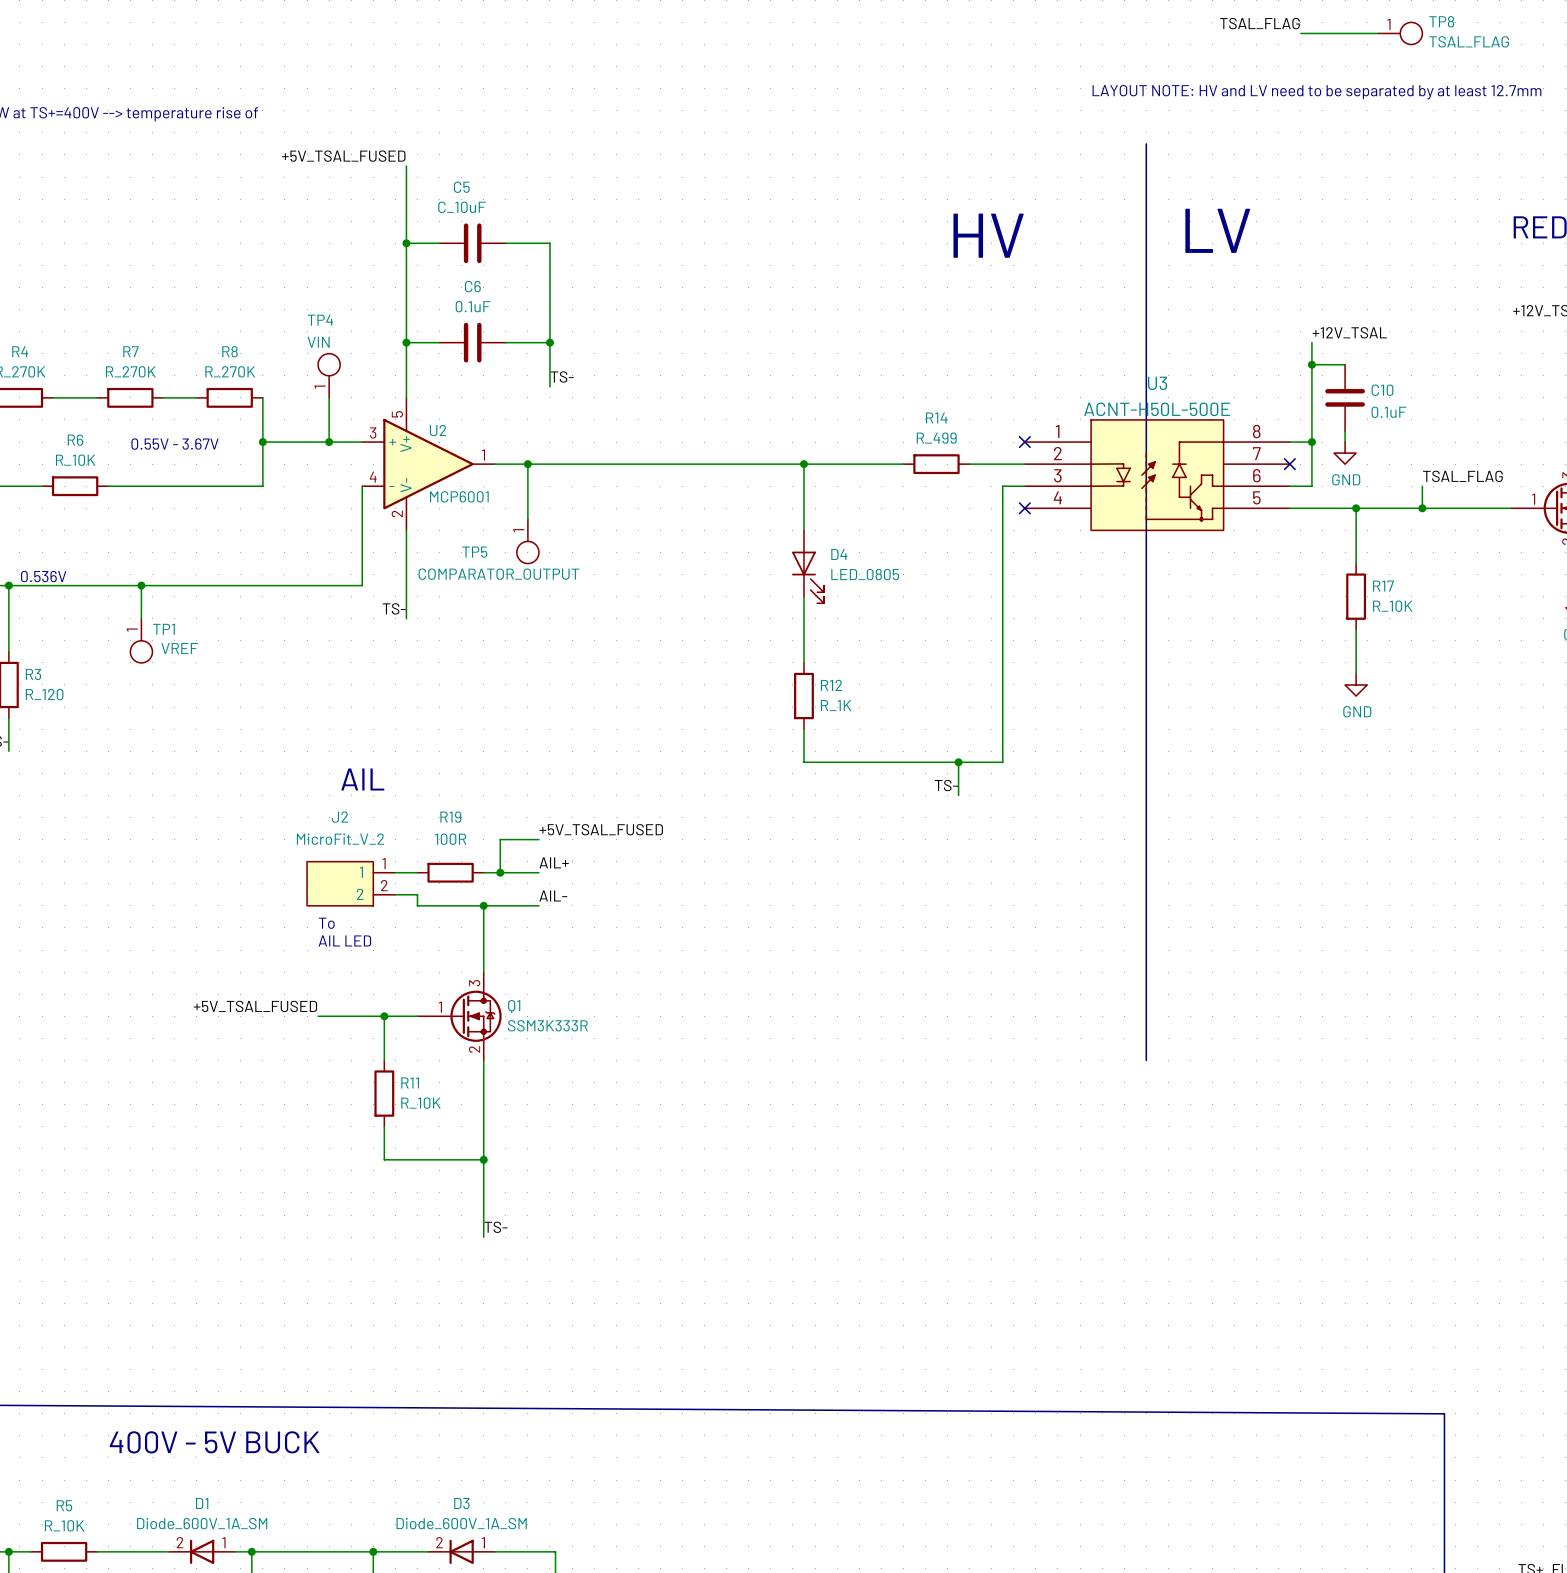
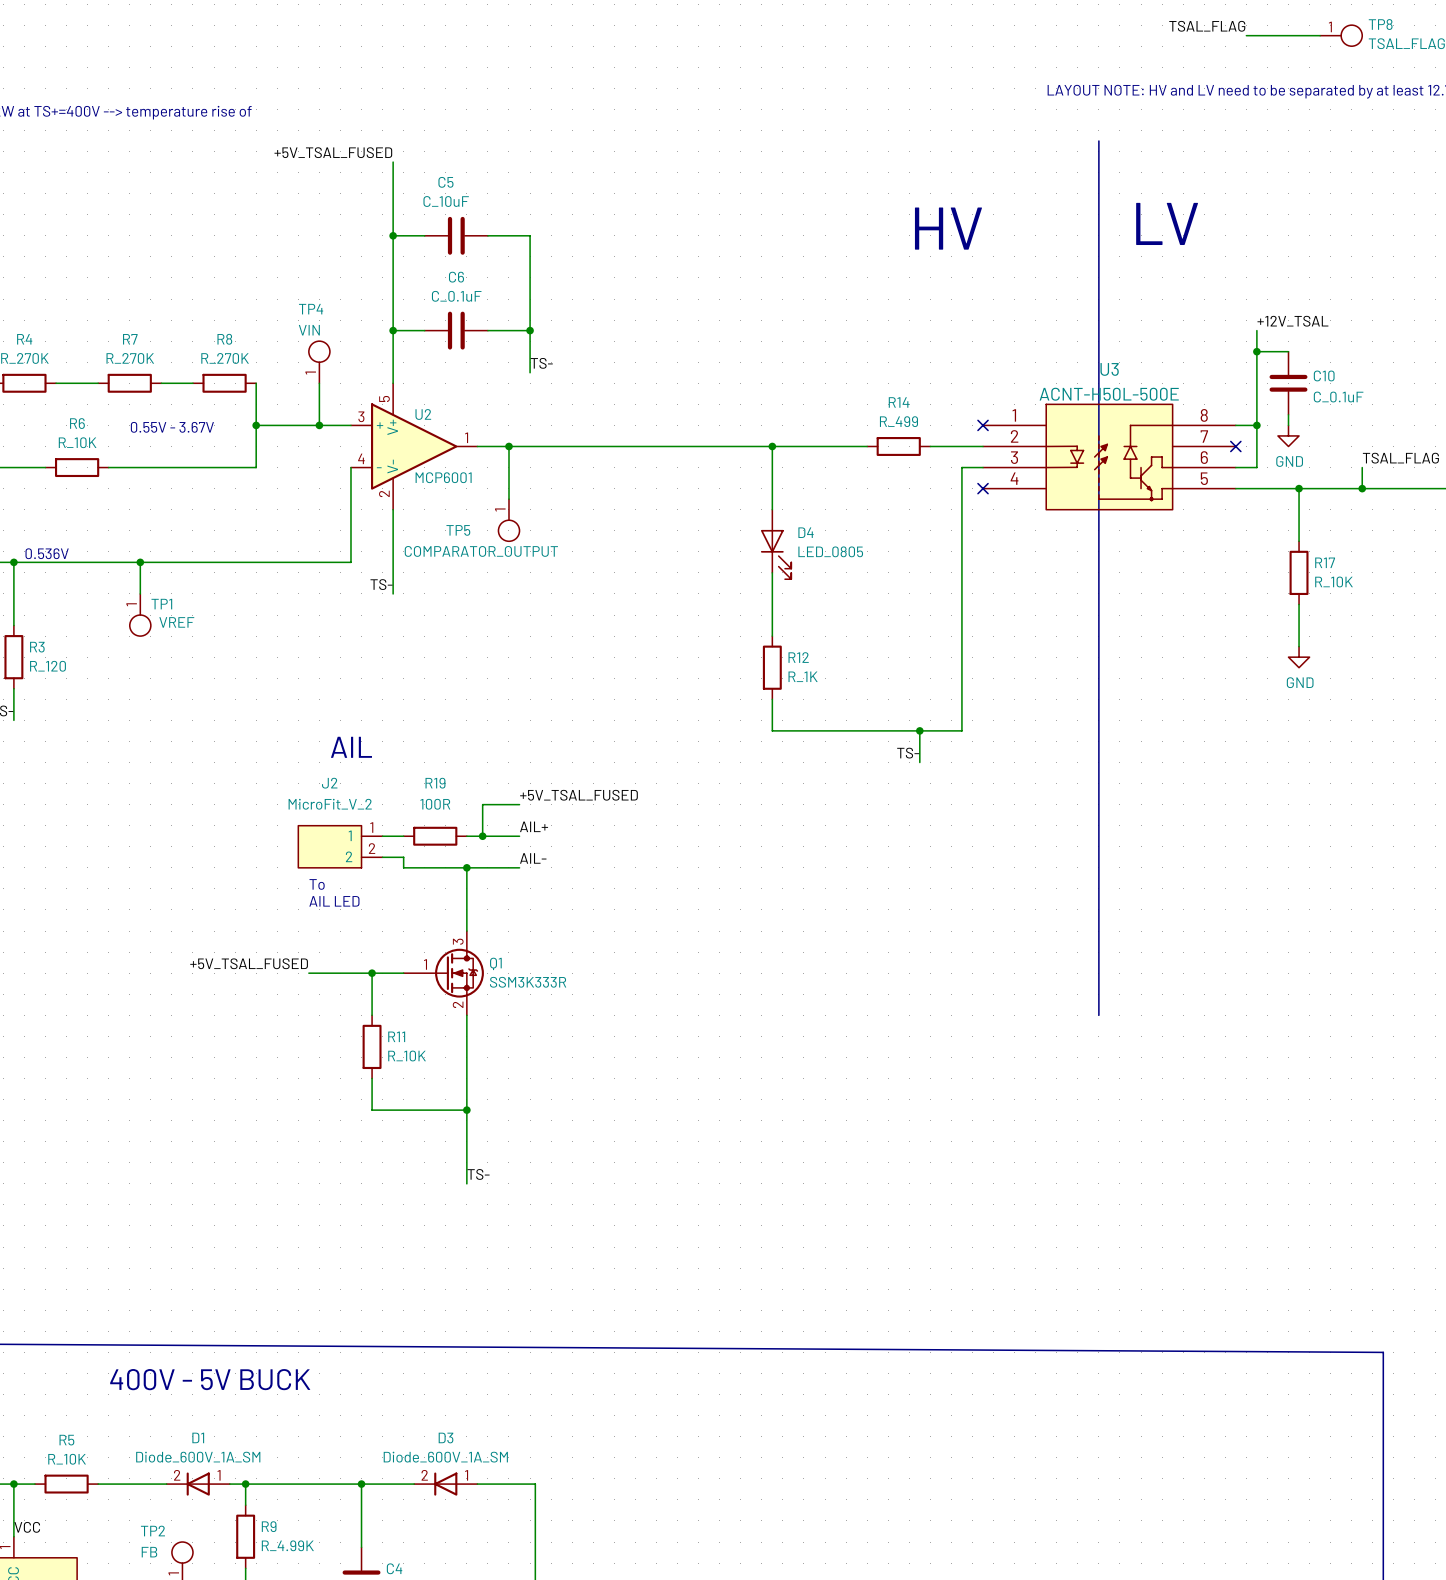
C6 value: 0.1uF (473, 306) -> C_0.1uF (456, 296)
C10 value: 0.1uF (1388, 412) -> C_0.1uF (1338, 397)

